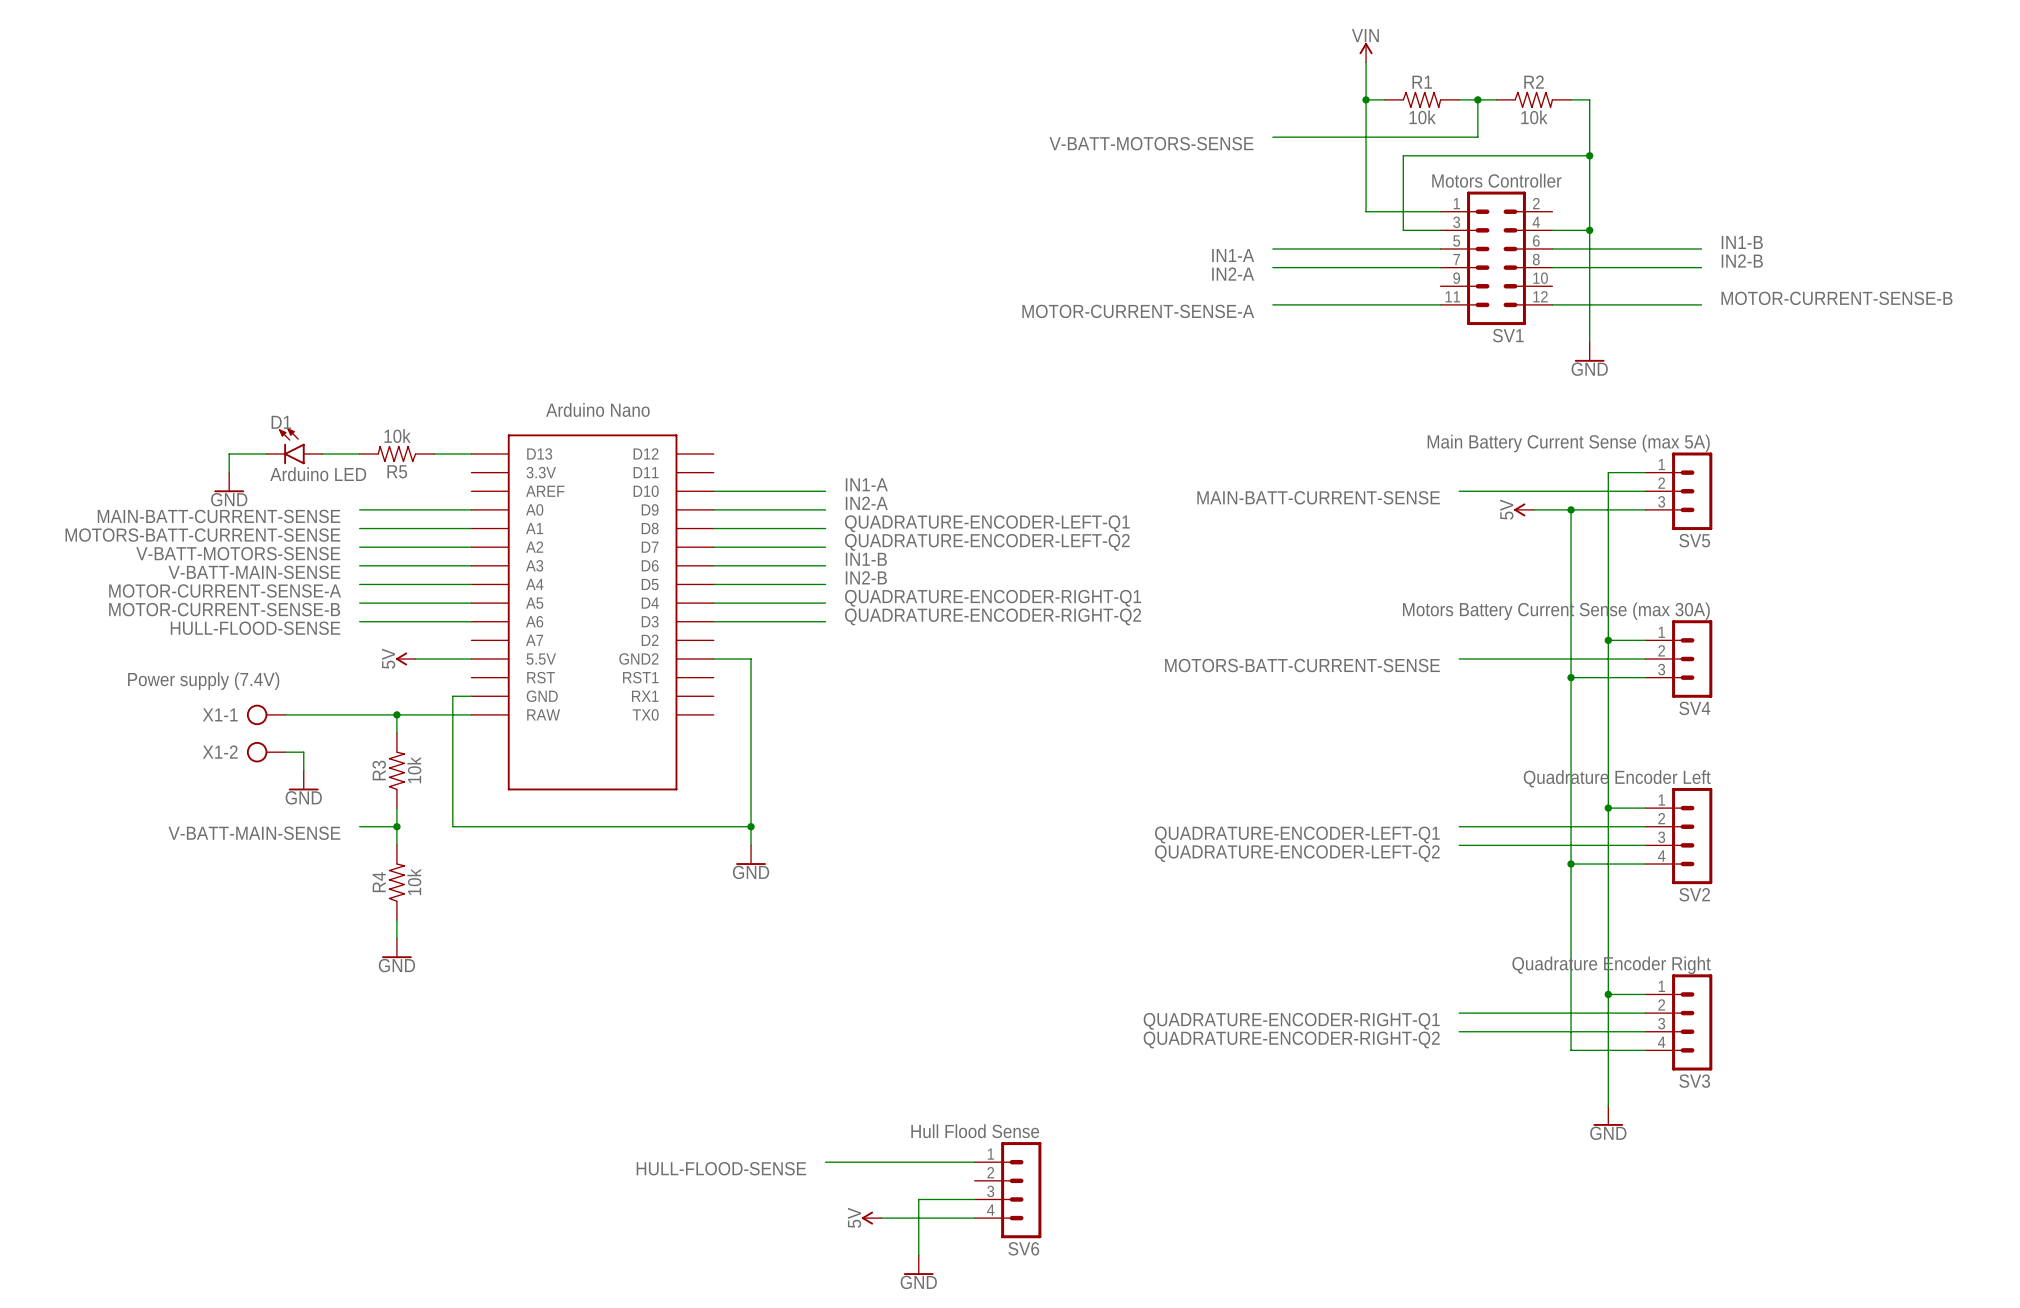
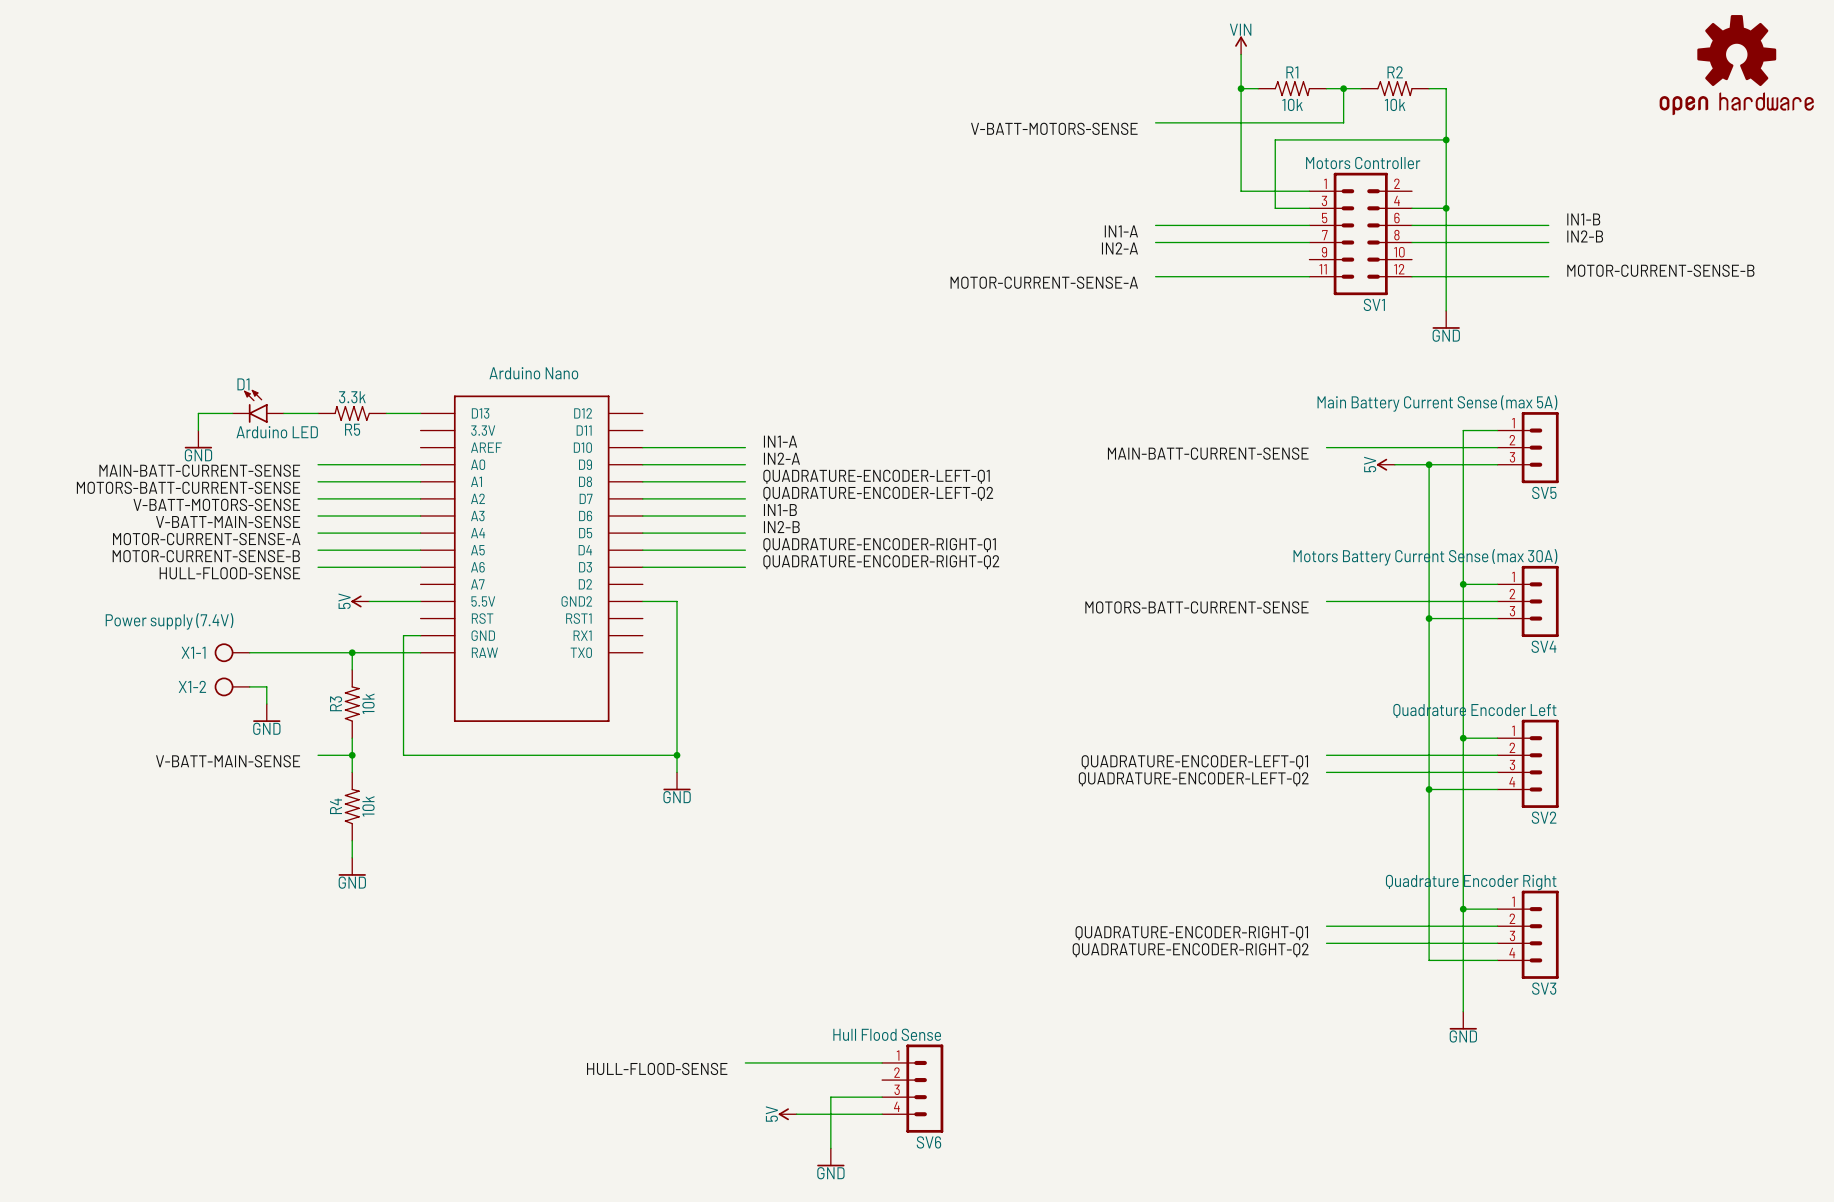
part: none -> (1736, 65)
R5 value: 10k (397, 436) -> 3.3k (352, 397)

